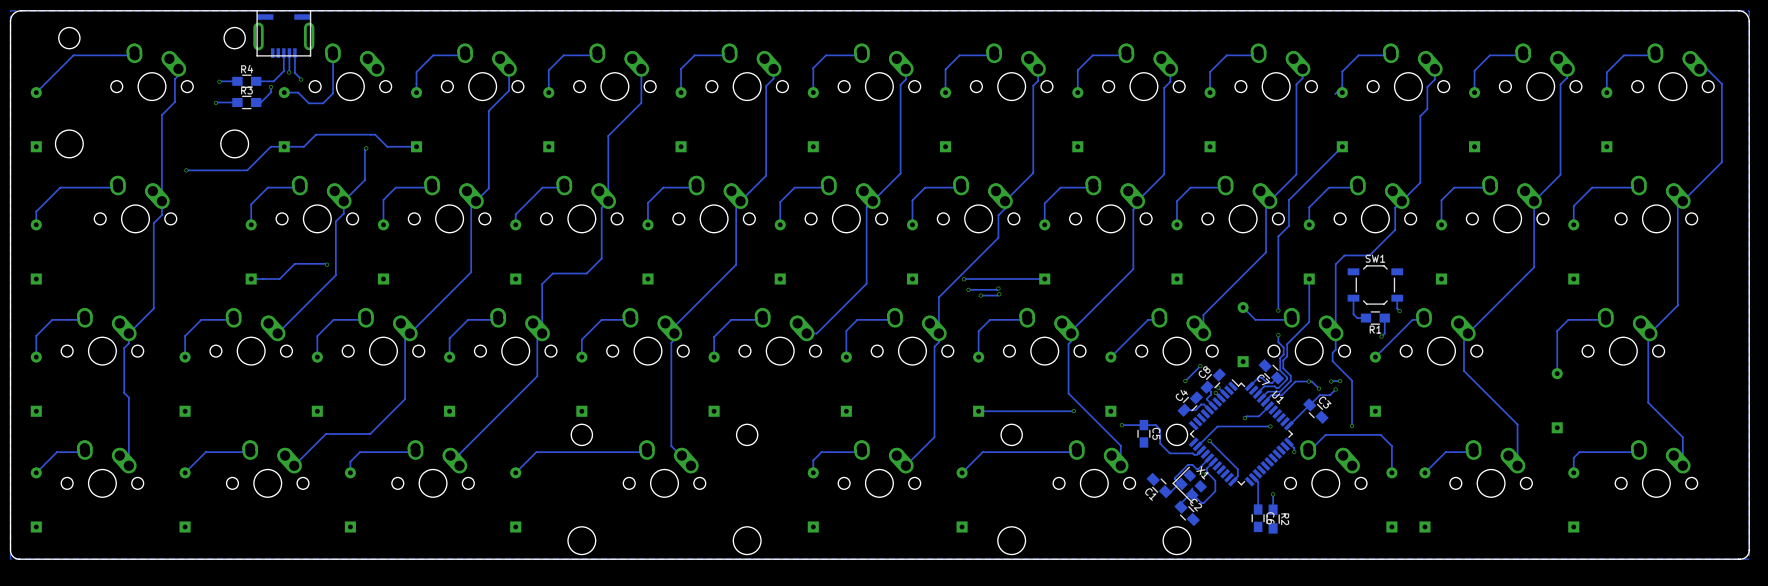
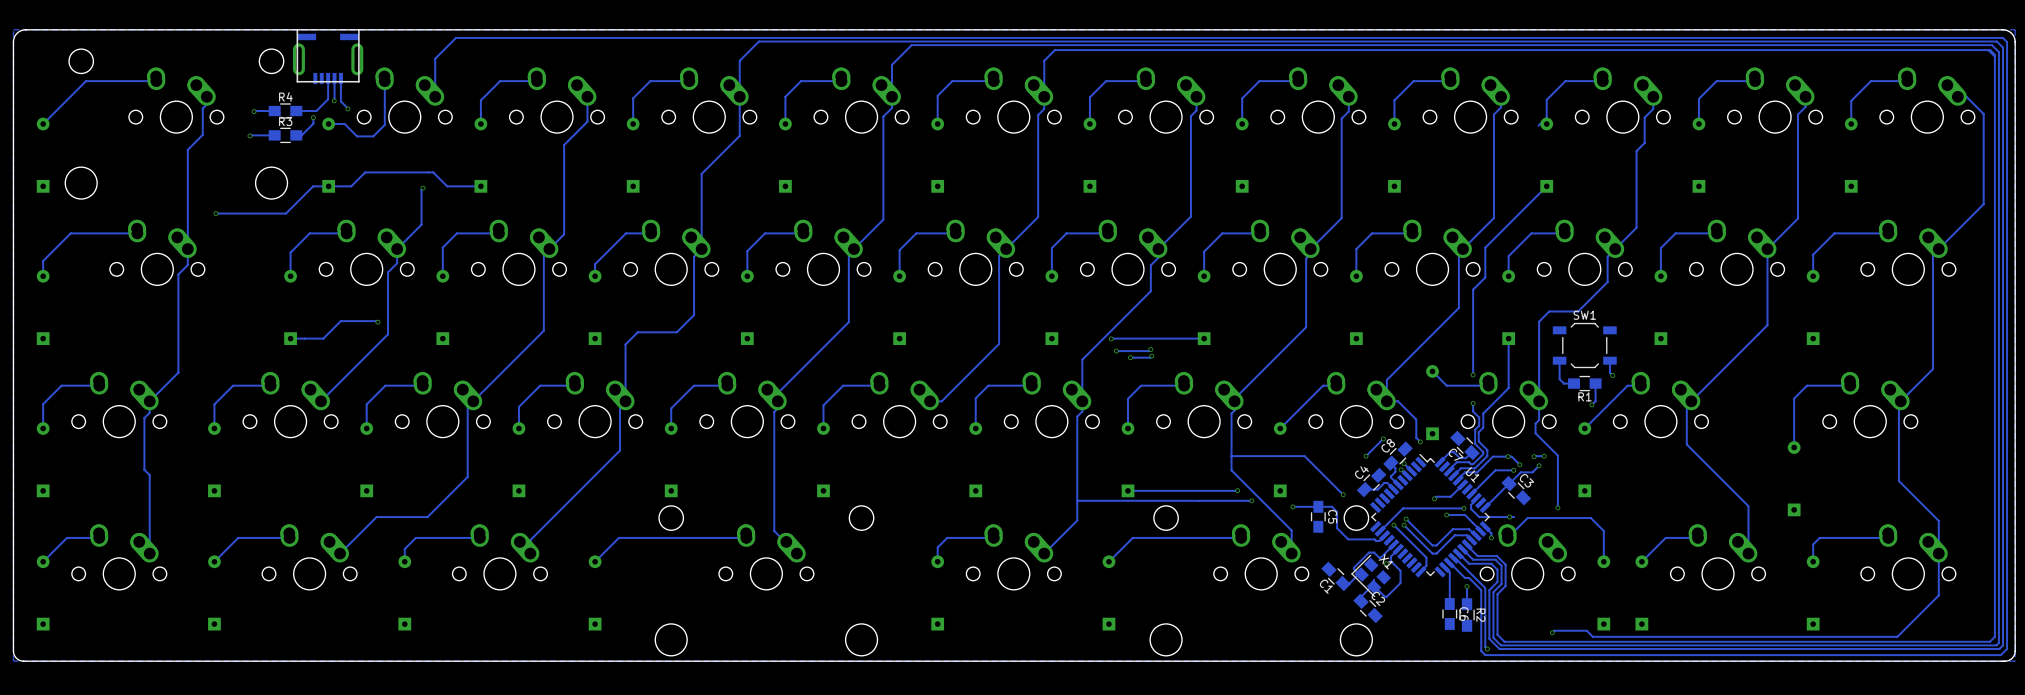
track: none -> (435, 96) (435, 58) (456, 37) (2002, 37) (2007, 42) (2007, 649) (2000, 655) (1485, 655) (1481, 651) (1481, 590) (1449, 562)
track: none -> (739, 96) (739, 60) (758, 41) (1996, 41) (2002, 47) (2002, 645) (1999, 649) (1499, 649) (1489, 638) (1489, 590) (1497, 582) (1497, 569) (1491, 563) (1469, 563) (1458, 553)
track: none -> (892, 96) (892, 64) (911, 45) (1991, 45) (1998, 52) (1998, 642) (1996, 645) (1501, 645) (1493, 637) (1493, 592) (1501, 584) (1501, 565) (1495, 559) (1473, 559) (1462, 549)
track: none -> (1044, 96) (1044, 60) (1054, 50) (1990, 50) (1994, 54) (1994, 636) (1989, 641) (1504, 641) (1497, 634) (1497, 594) (1505, 586) (1505, 564) (1496, 556) (1477, 556) (1467, 544)
track: none -> (1386, 401) (1398, 401) (1416, 419) (1416, 437) (1420, 441)
via: none -> (1420, 441)
track: none -> (1231, 456) (1304, 456) (1343, 494)
track: none -> (1513, 470) (1495, 470) (1471, 493)
via: none -> (1513, 470)
via: none -> (1343, 494)
track: none -> (1476, 498) (1471, 504) (1471, 508) (1479, 517) (1513, 517)
track: none -> (1251, 500) (1077, 500)
via: none -> (1251, 500)
track: none -> (1446, 515) (1465, 515) (1480, 531)
via: none -> (1446, 515)
via: none -> (1509, 517)
track: none -> (1406, 519) (1432, 545) (1436, 545) (1452, 529) (1469, 529) (1476, 535)
via: none -> (1406, 519)
track: none -> (1404, 525) (1432, 553) (1436, 553) (1454, 535) (1467, 535) (1471, 540)
via: none -> (1404, 525)
track: none -> (1938, 553) (1938, 595) (1897, 636) (1592, 636) (1586, 630) (1554, 630) (1552, 632)
track: none -> (1453, 558) (1485, 588) (1485, 646) (1487, 649)
via: none -> (1552, 632)
via: none -> (1487, 649)

